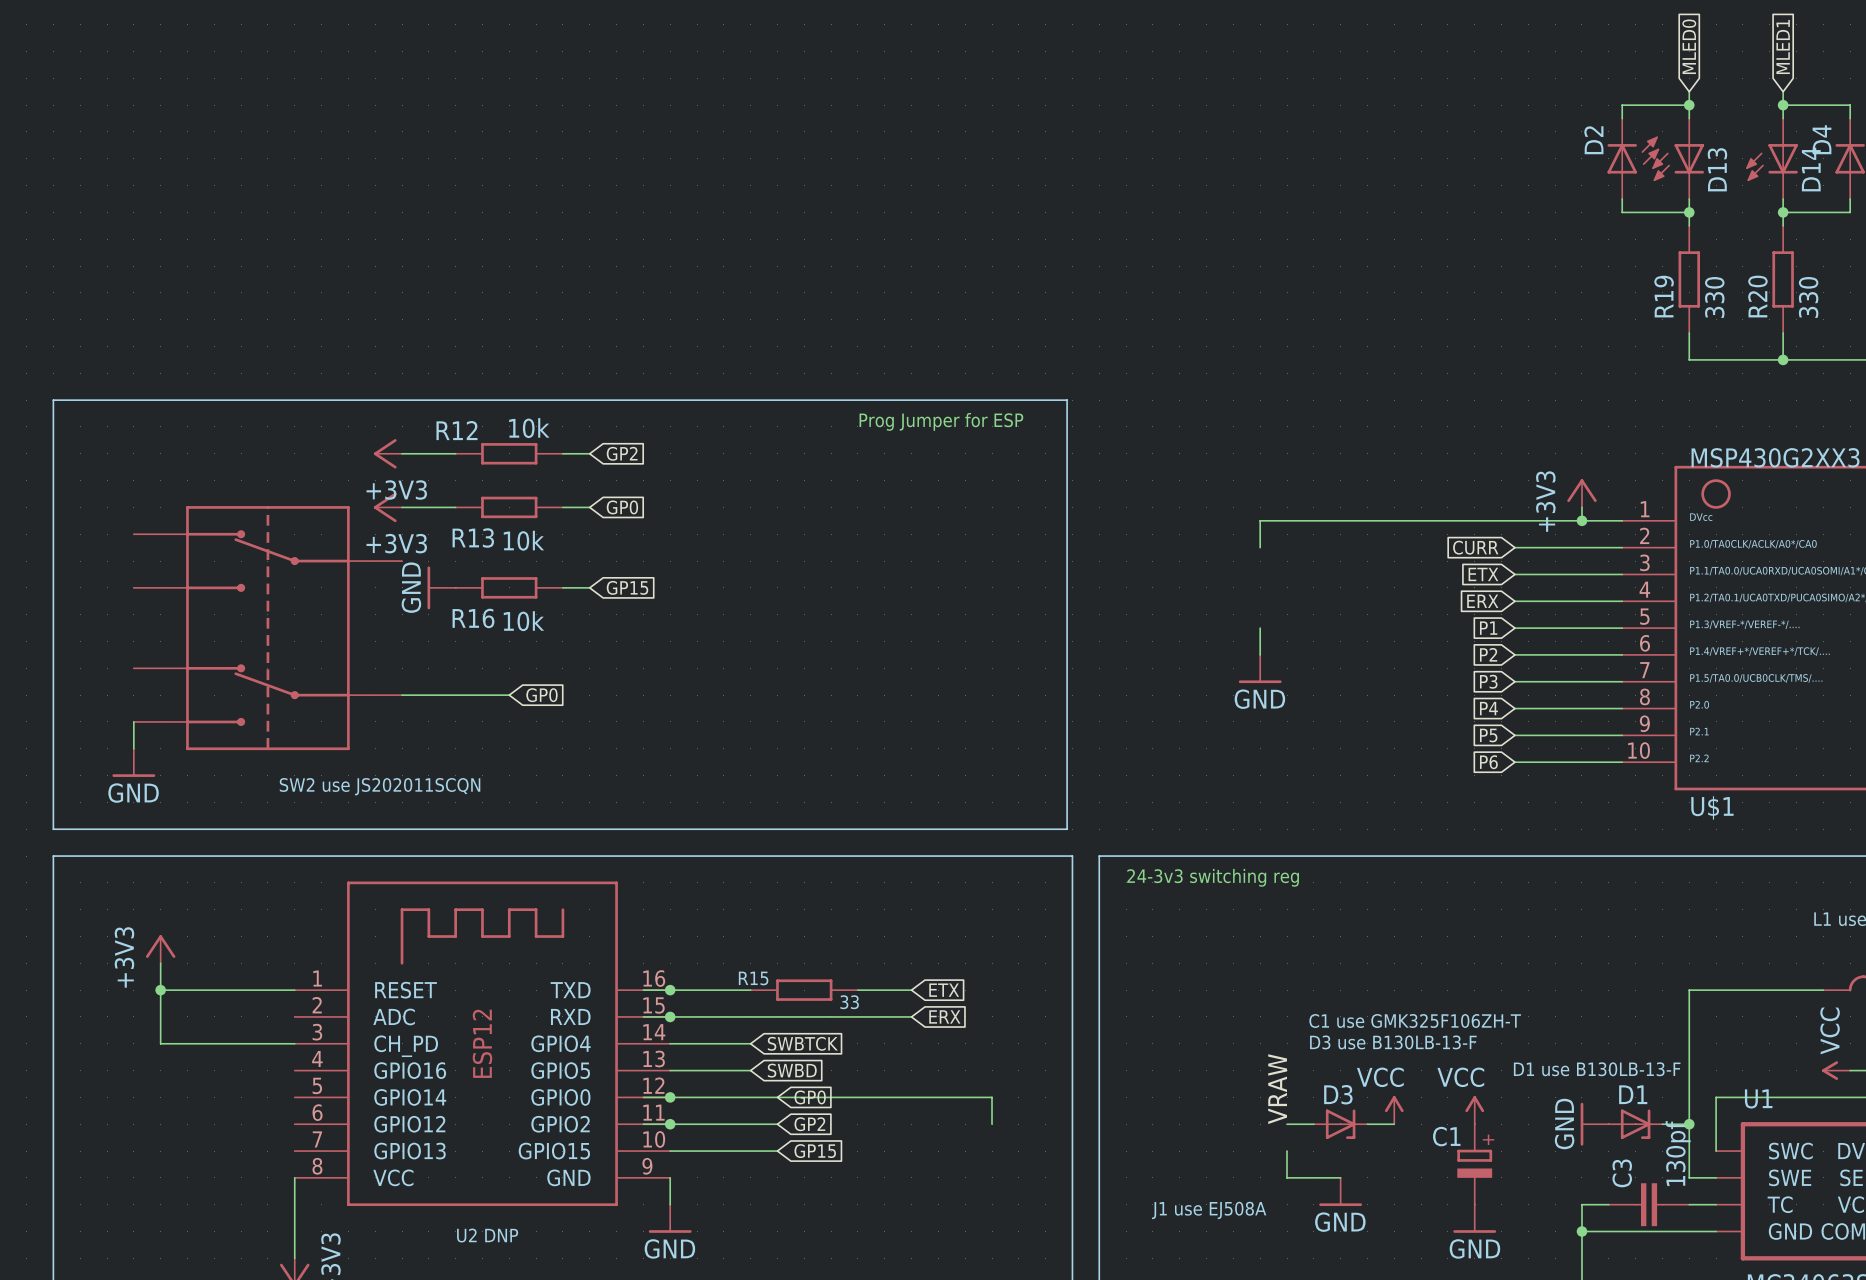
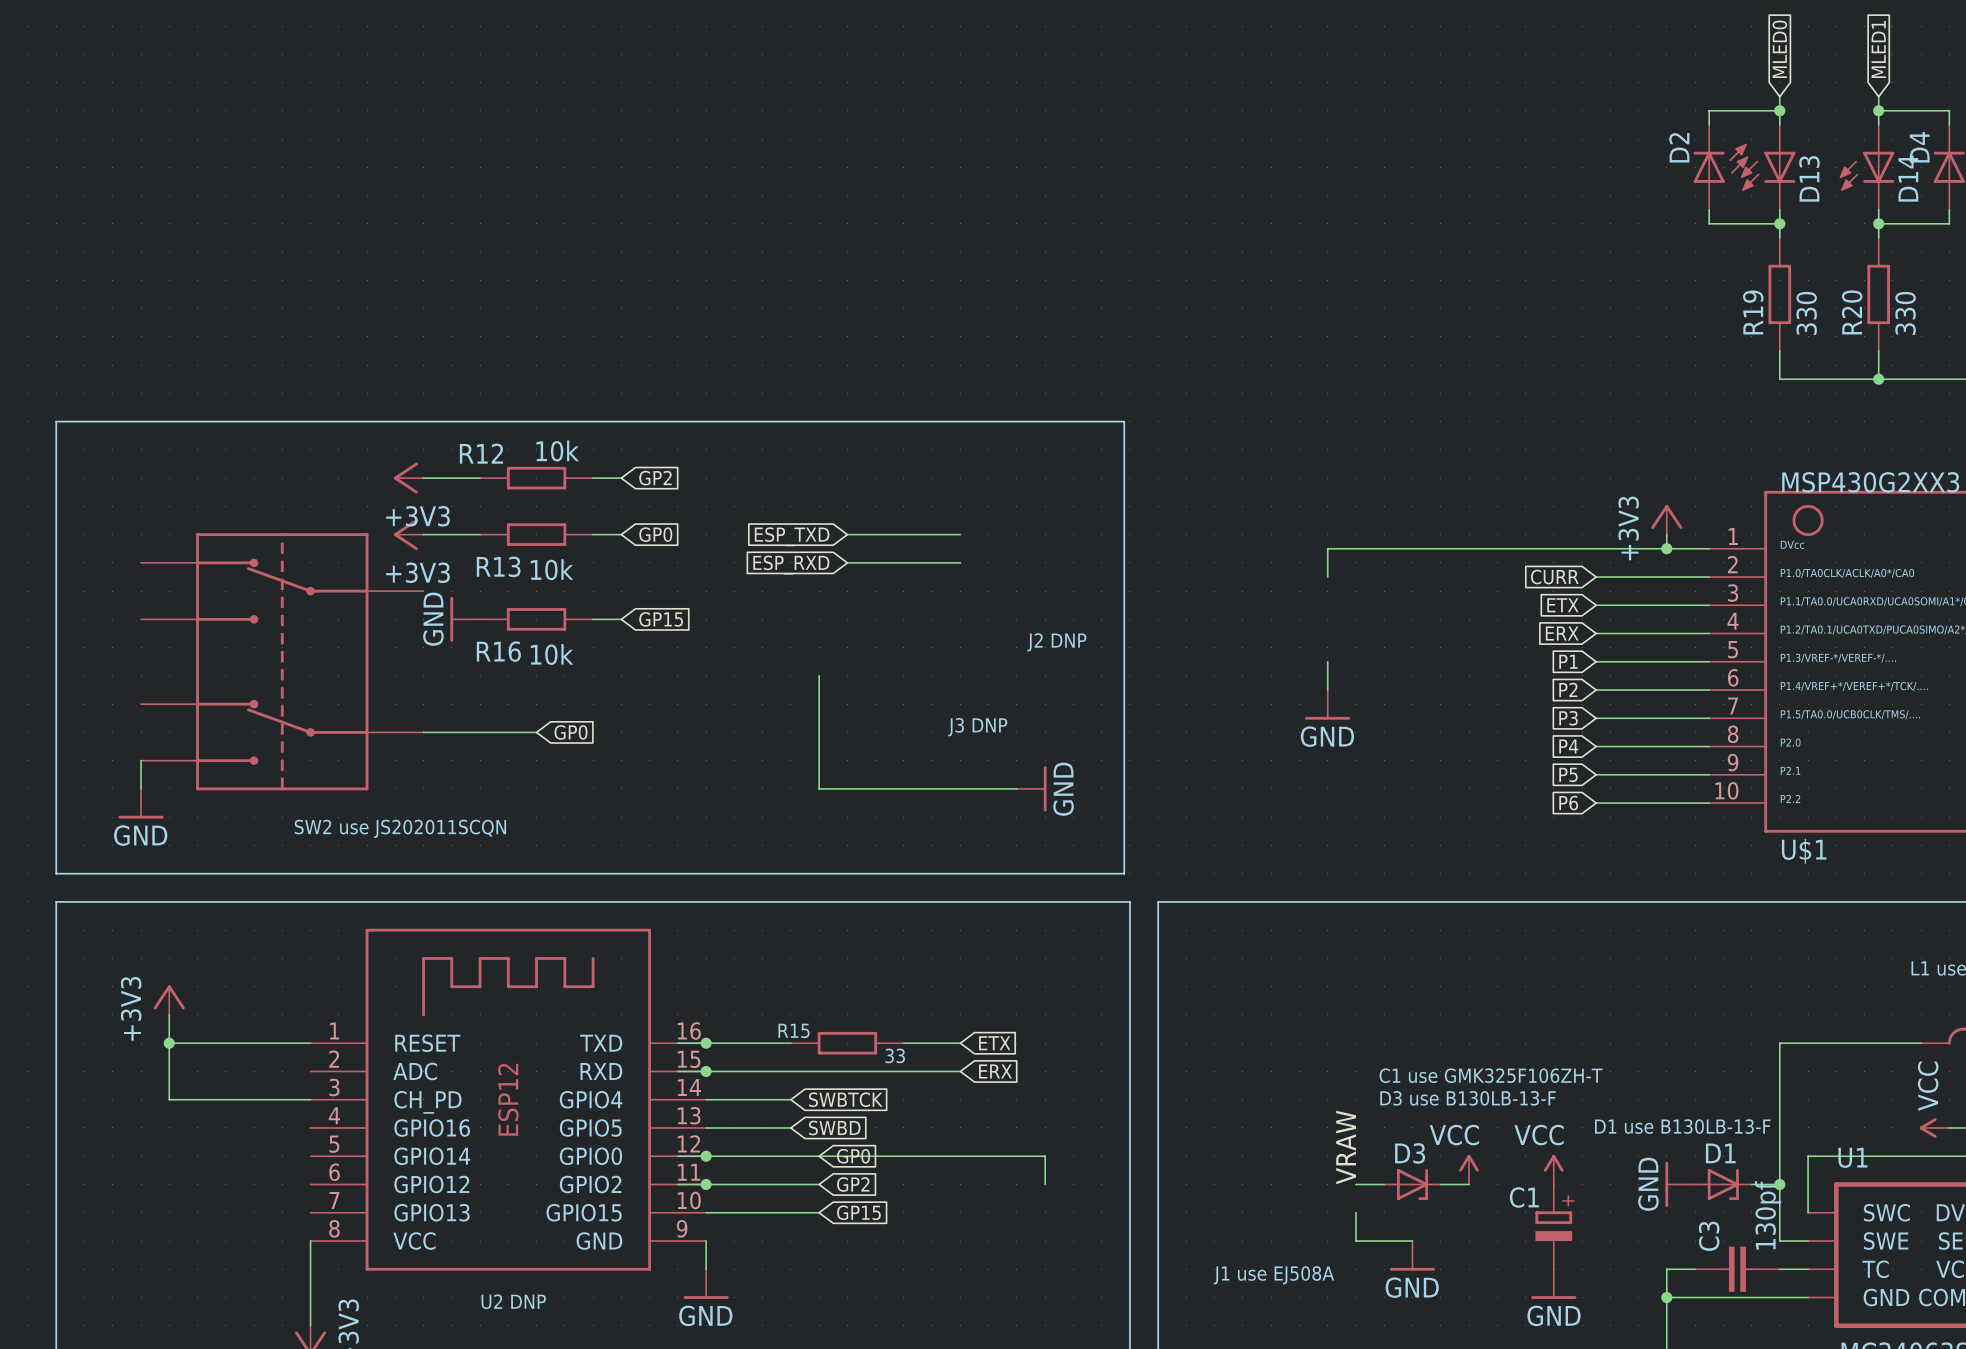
text: Prog Jumper for ESP (941, 421) -> none
wire: none -> (847, 534) (960, 534)
global label: none -> ESP_TXD (792, 536)
wire: none -> (847, 562) (960, 562)
global label: none -> ESP_RXD (791, 565)
text: none -> J2 DNP (1056, 642)
wire: none -> (819, 675) (819, 788) (1016, 788)
text: none -> J3 DNP (977, 727)
power symbol: none -> GND (1031, 788)
text: 24-3v3 switching reg (1213, 877) -> none

